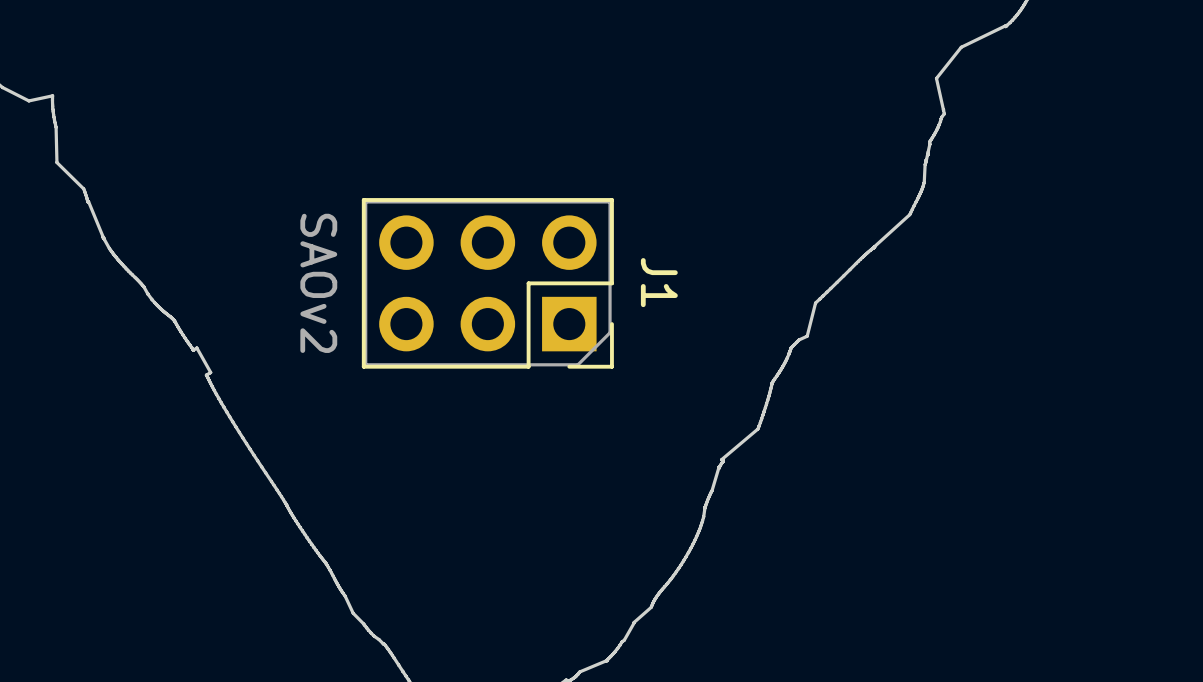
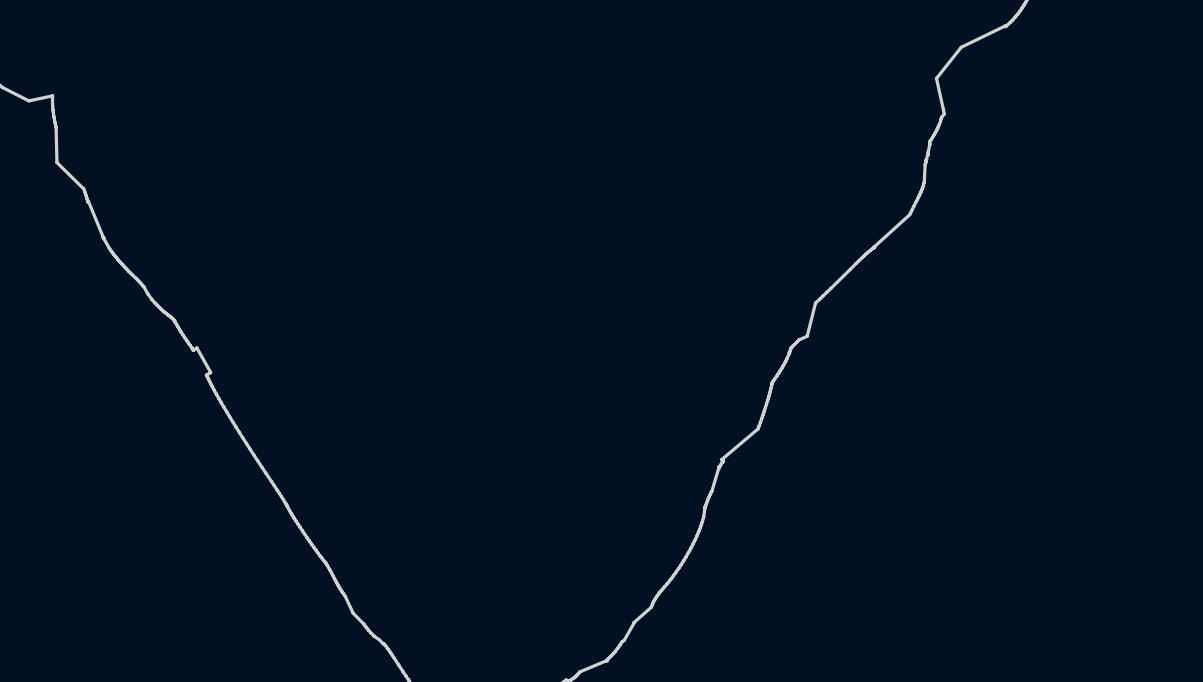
J1: SAOv2 (487, 283) -> none

